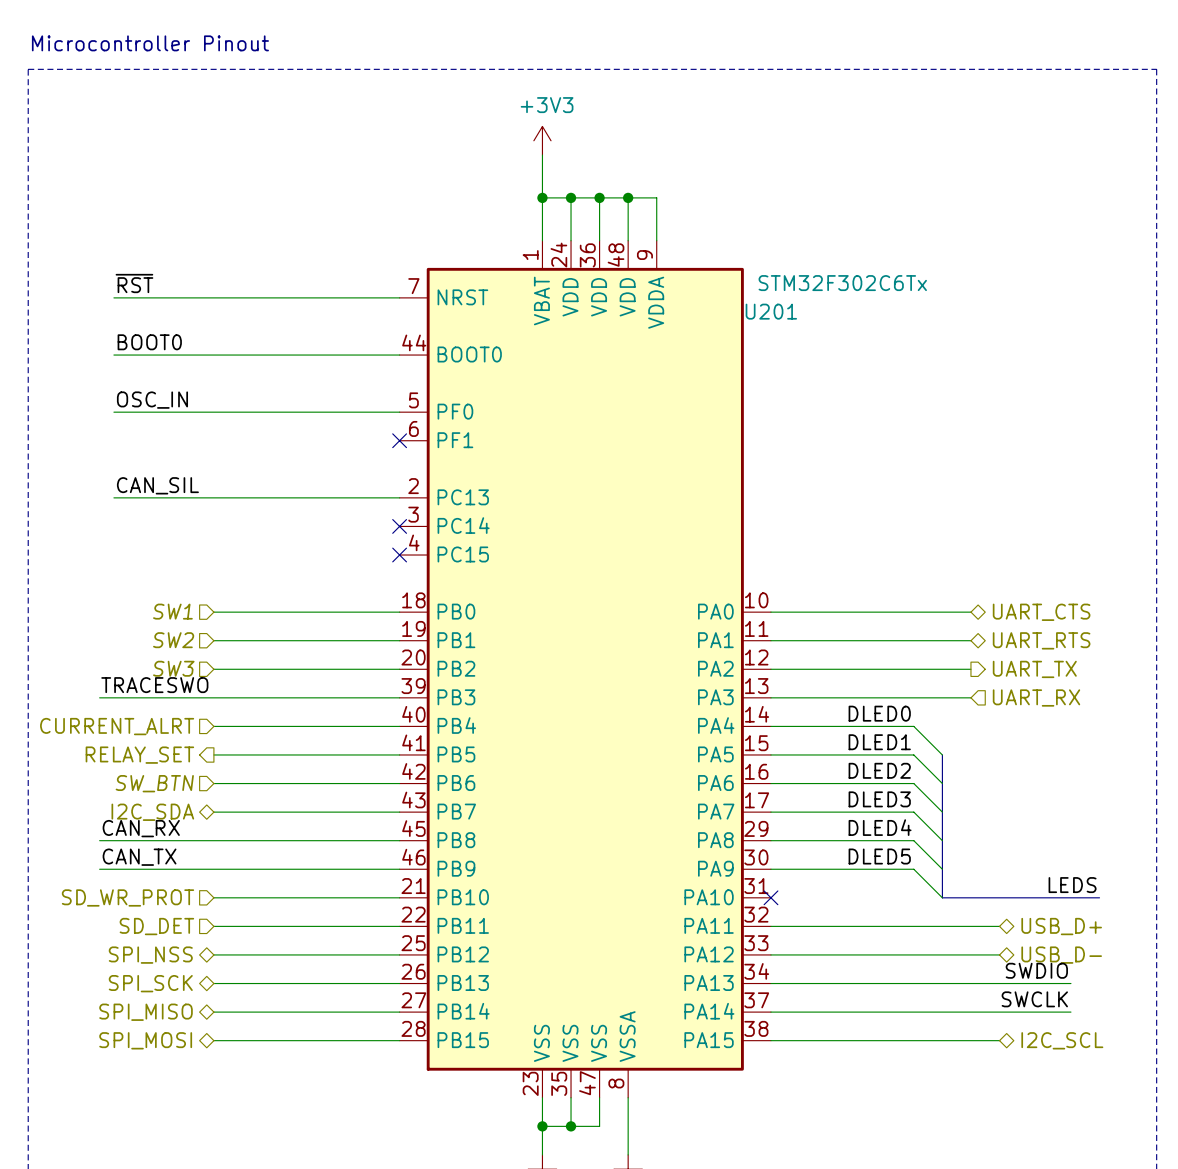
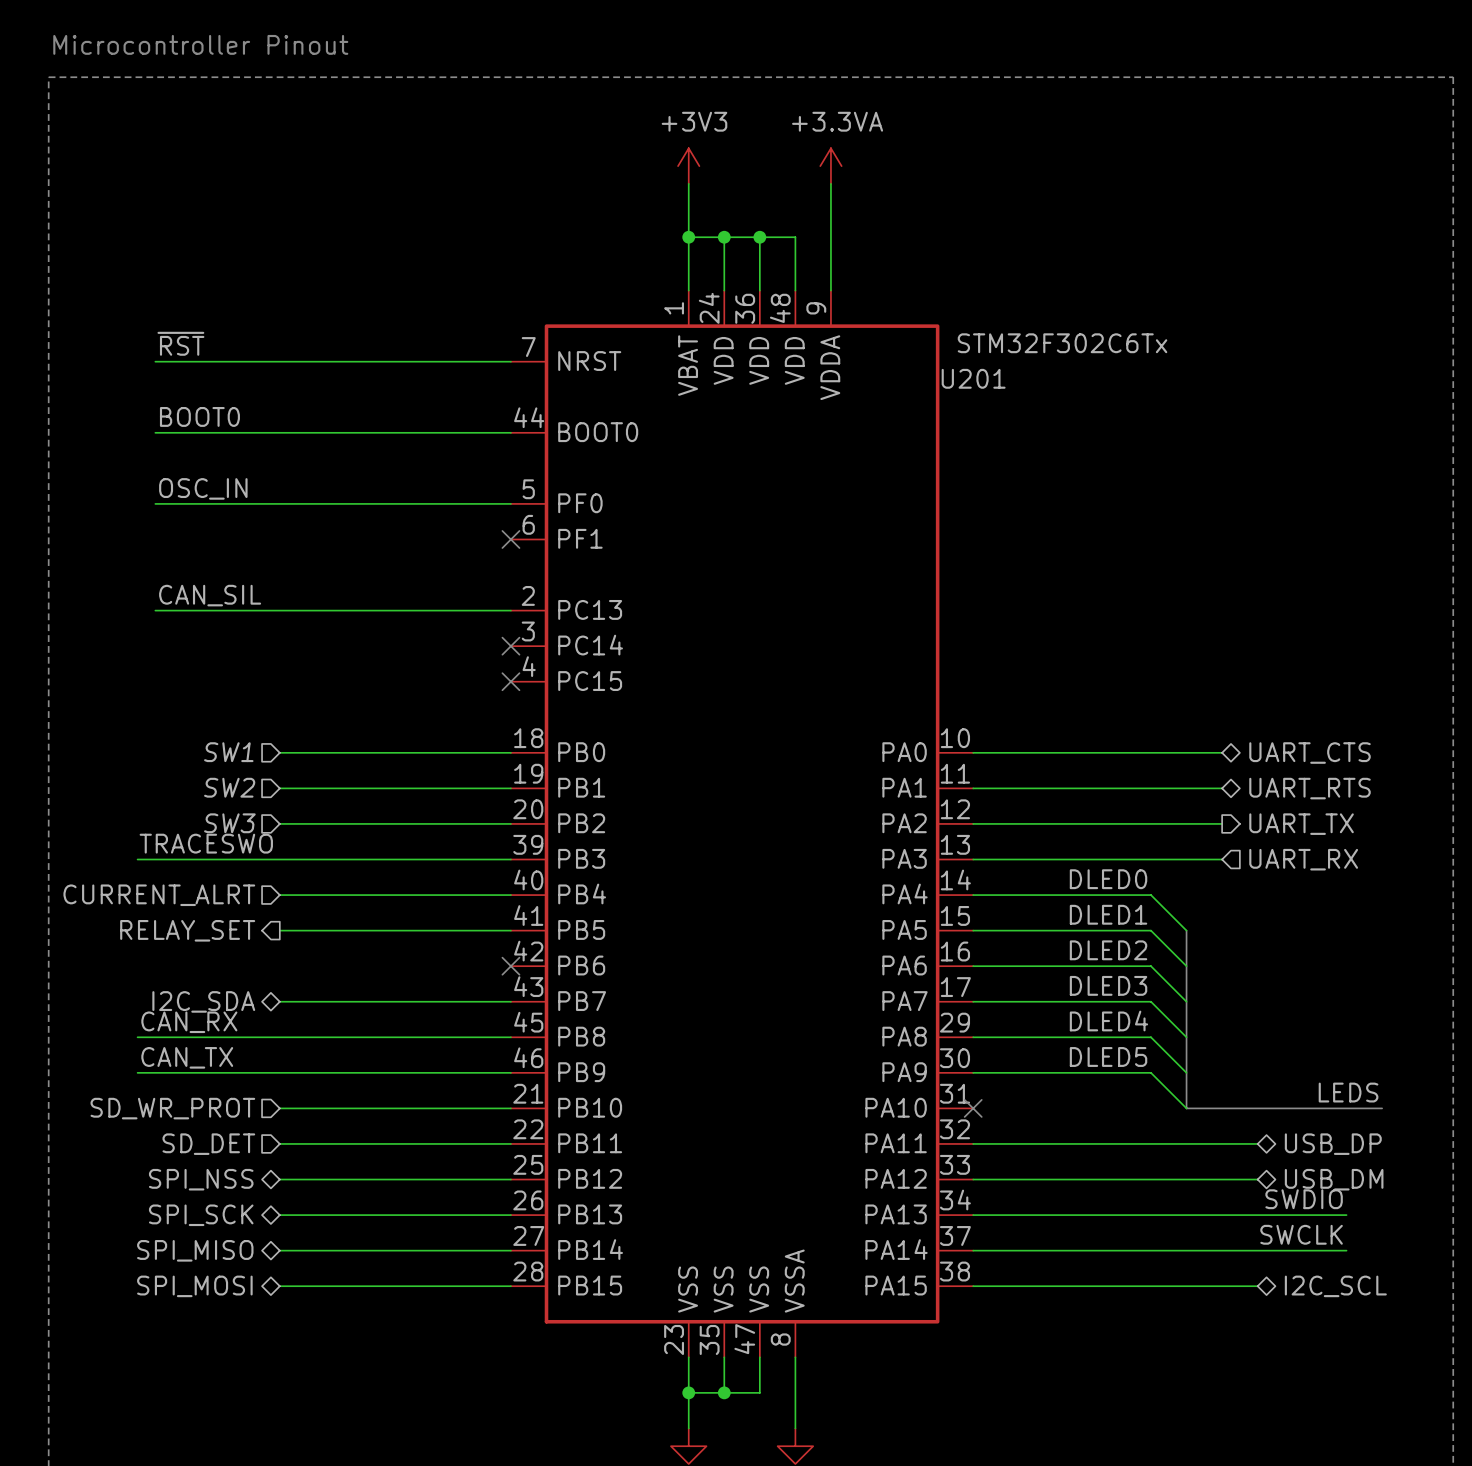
power symbol: none -> +3.3VA (830, 166)
wire: (628, 197) (656, 197) -> (830, 183) (830, 237)
junction: (628, 197) -> none
hierarchical label: SW_BTN (154, 783) -> none
wire: (213, 783) (399, 783) -> none
no-connect mark: none -> (510, 966)
hierarchical label: USB_D+ (1061, 926) -> USB_DP (1333, 1144)
hierarchical label: USB_D- (1061, 955) -> USB_DM (1334, 1179)

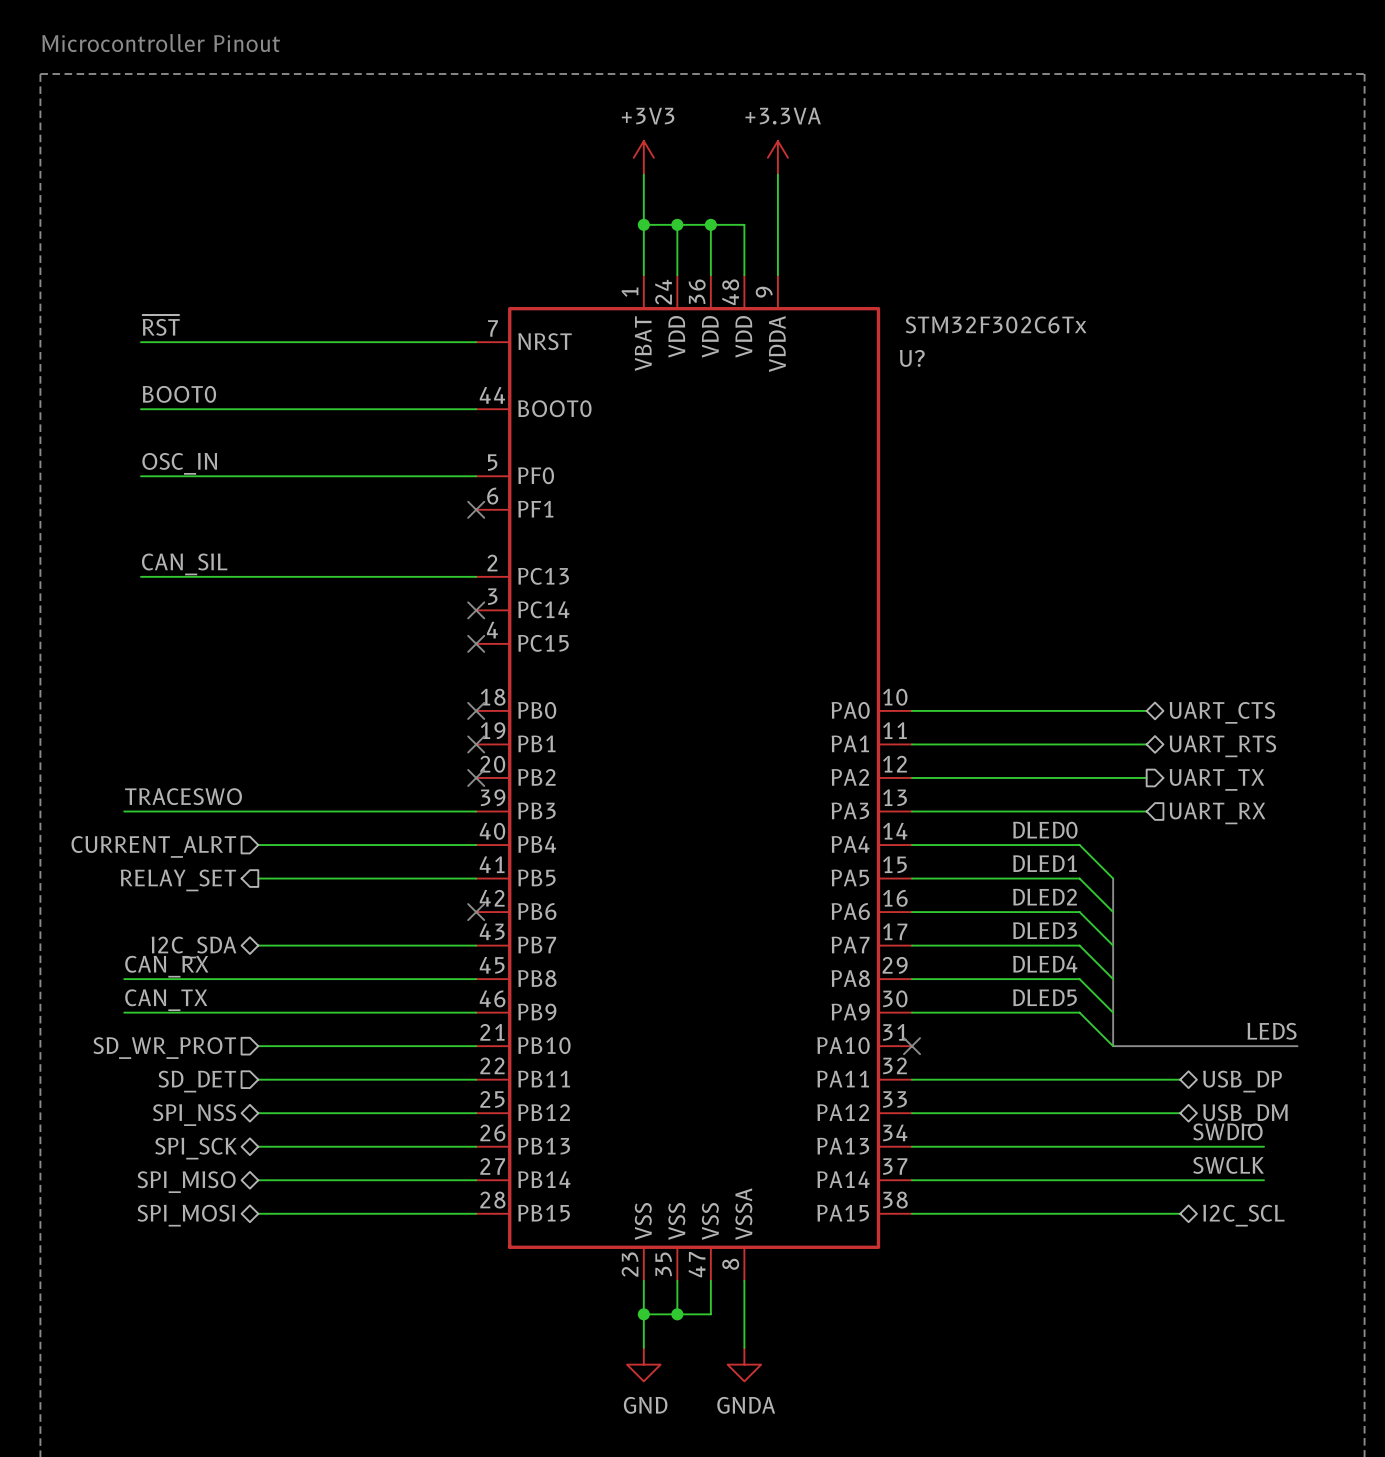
U201 name: U201 (973, 378) -> U? (912, 358)
hierarchical label: SW1 (228, 752) -> none
wire: (279, 752) (510, 752) -> none
no-connect mark: none -> (476, 710)
hierarchical label: SW2 (229, 787) -> none
wire: (279, 788) (510, 788) -> none
no-connect mark: none -> (476, 744)
hierarchical label: SW3 (229, 823) -> none
wire: (279, 823) (510, 823) -> none
no-connect mark: none -> (476, 777)

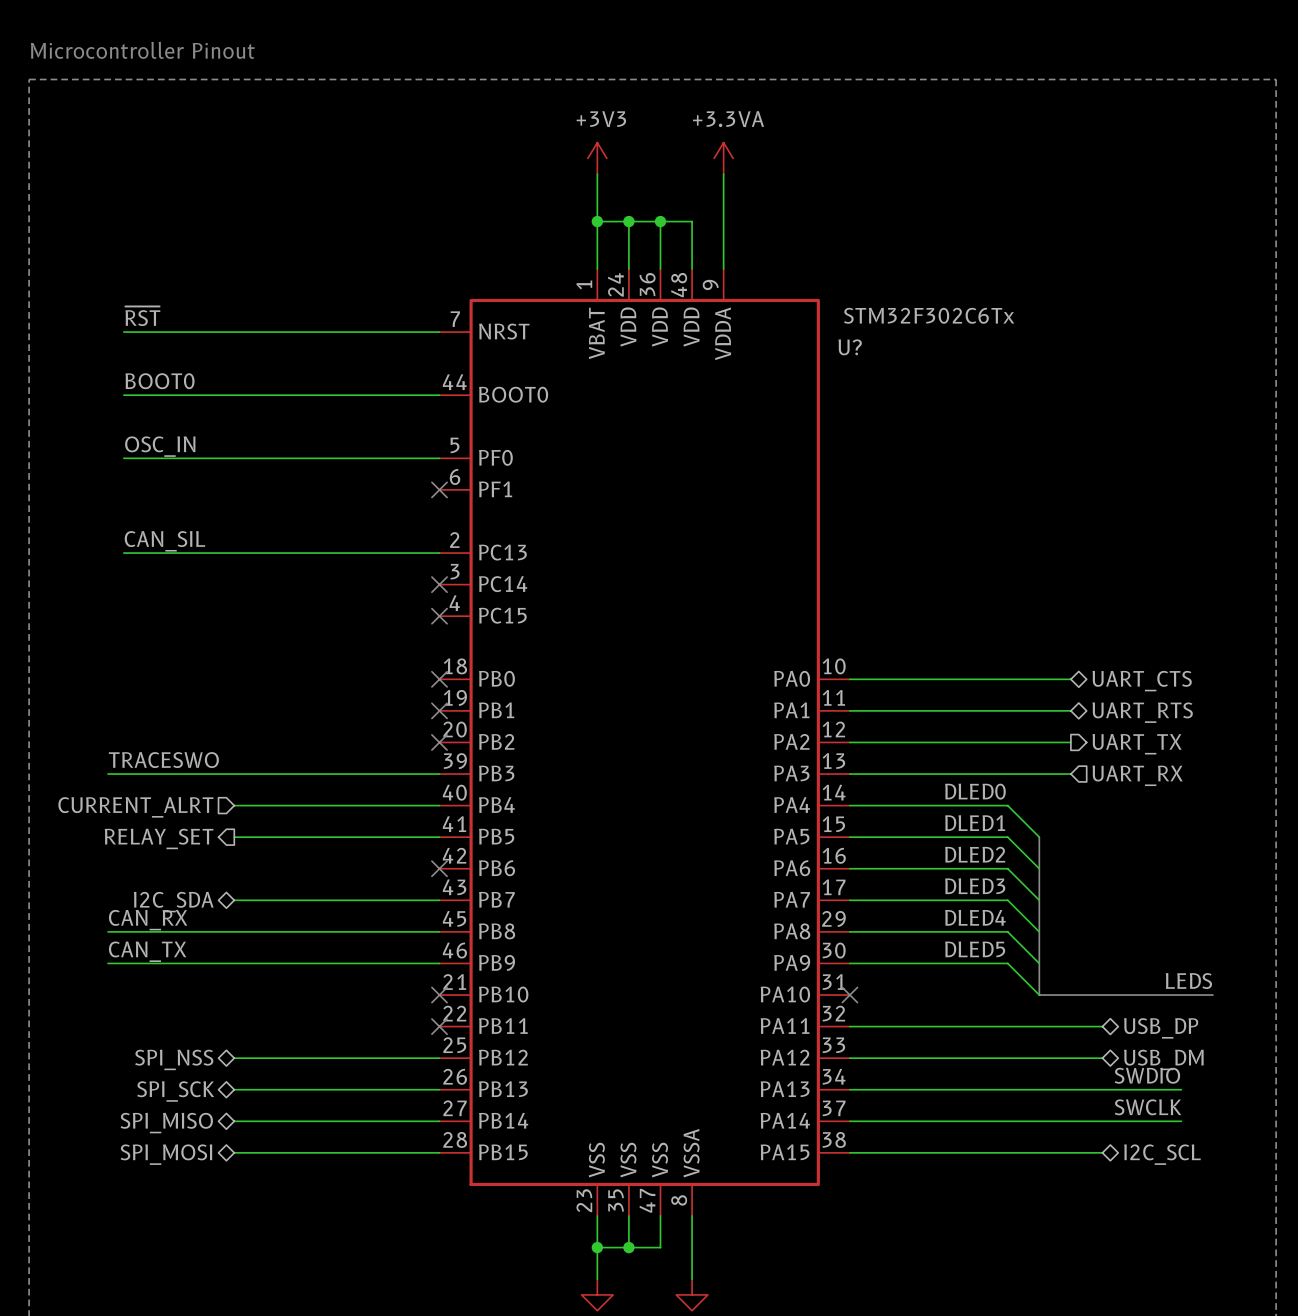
wire: (258, 1046) (476, 1046) -> none
no-connect mark: none -> (439, 995)
hierarchical label: SD_WR_PROT (164, 1048) -> none
wire: (258, 1079) (476, 1079) -> none
no-connect mark: none -> (439, 1026)
hierarchical label: SD_DET (197, 1081) -> none

